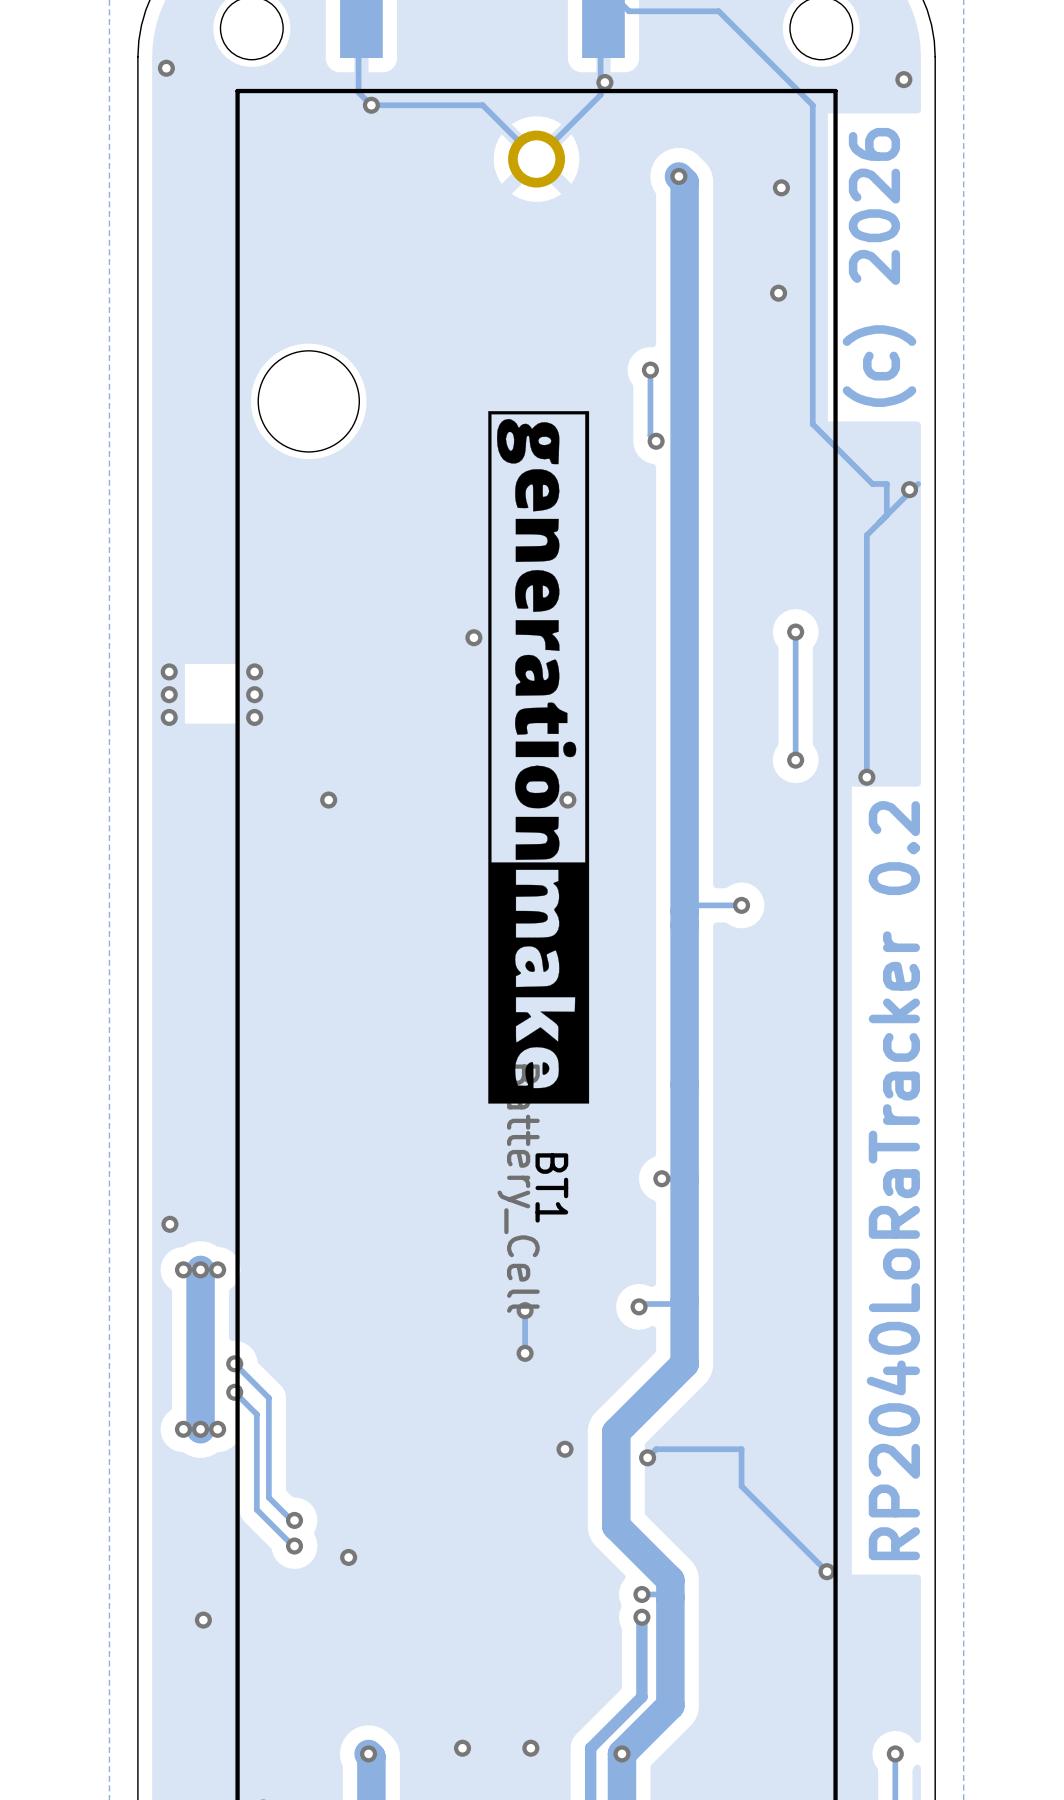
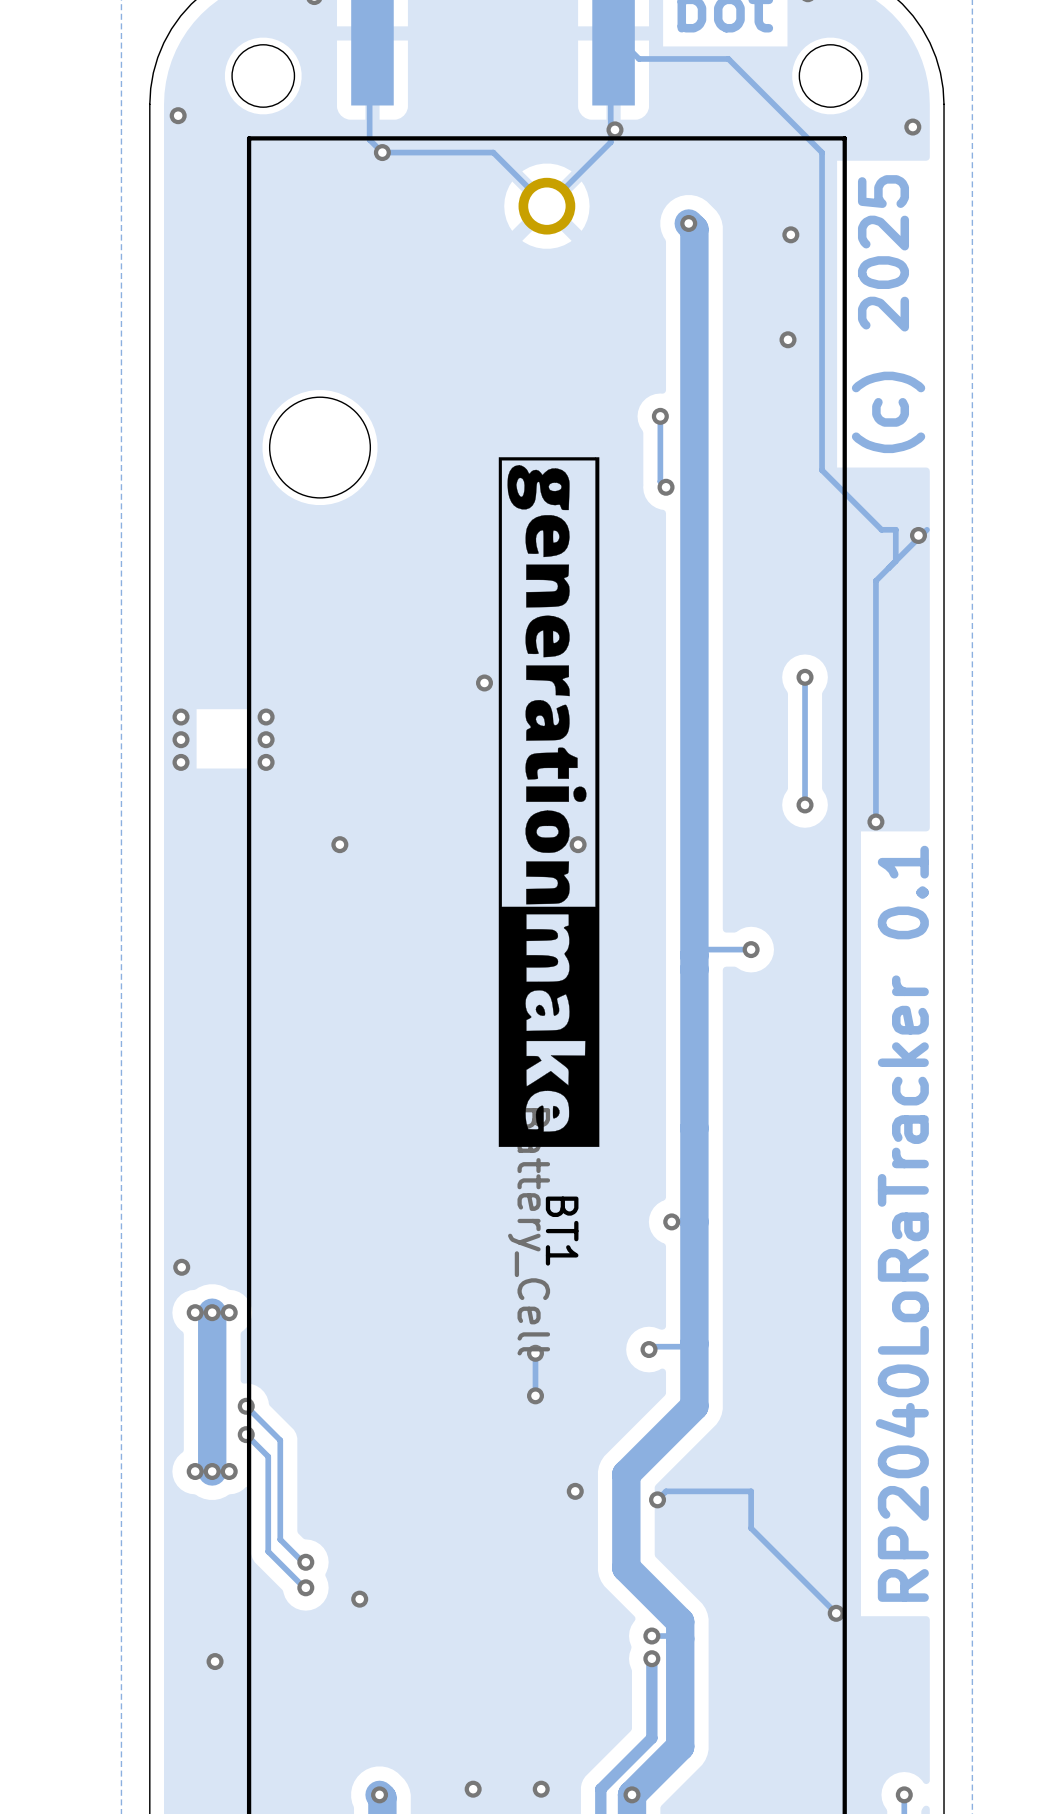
text: (c) 2026 (879, 267) -> (c) 2025 (888, 314)
text: RP2040LoRaTracker 0.2 (893, 1180) -> RP2040LoRaTracker 0.1 (902, 1223)

